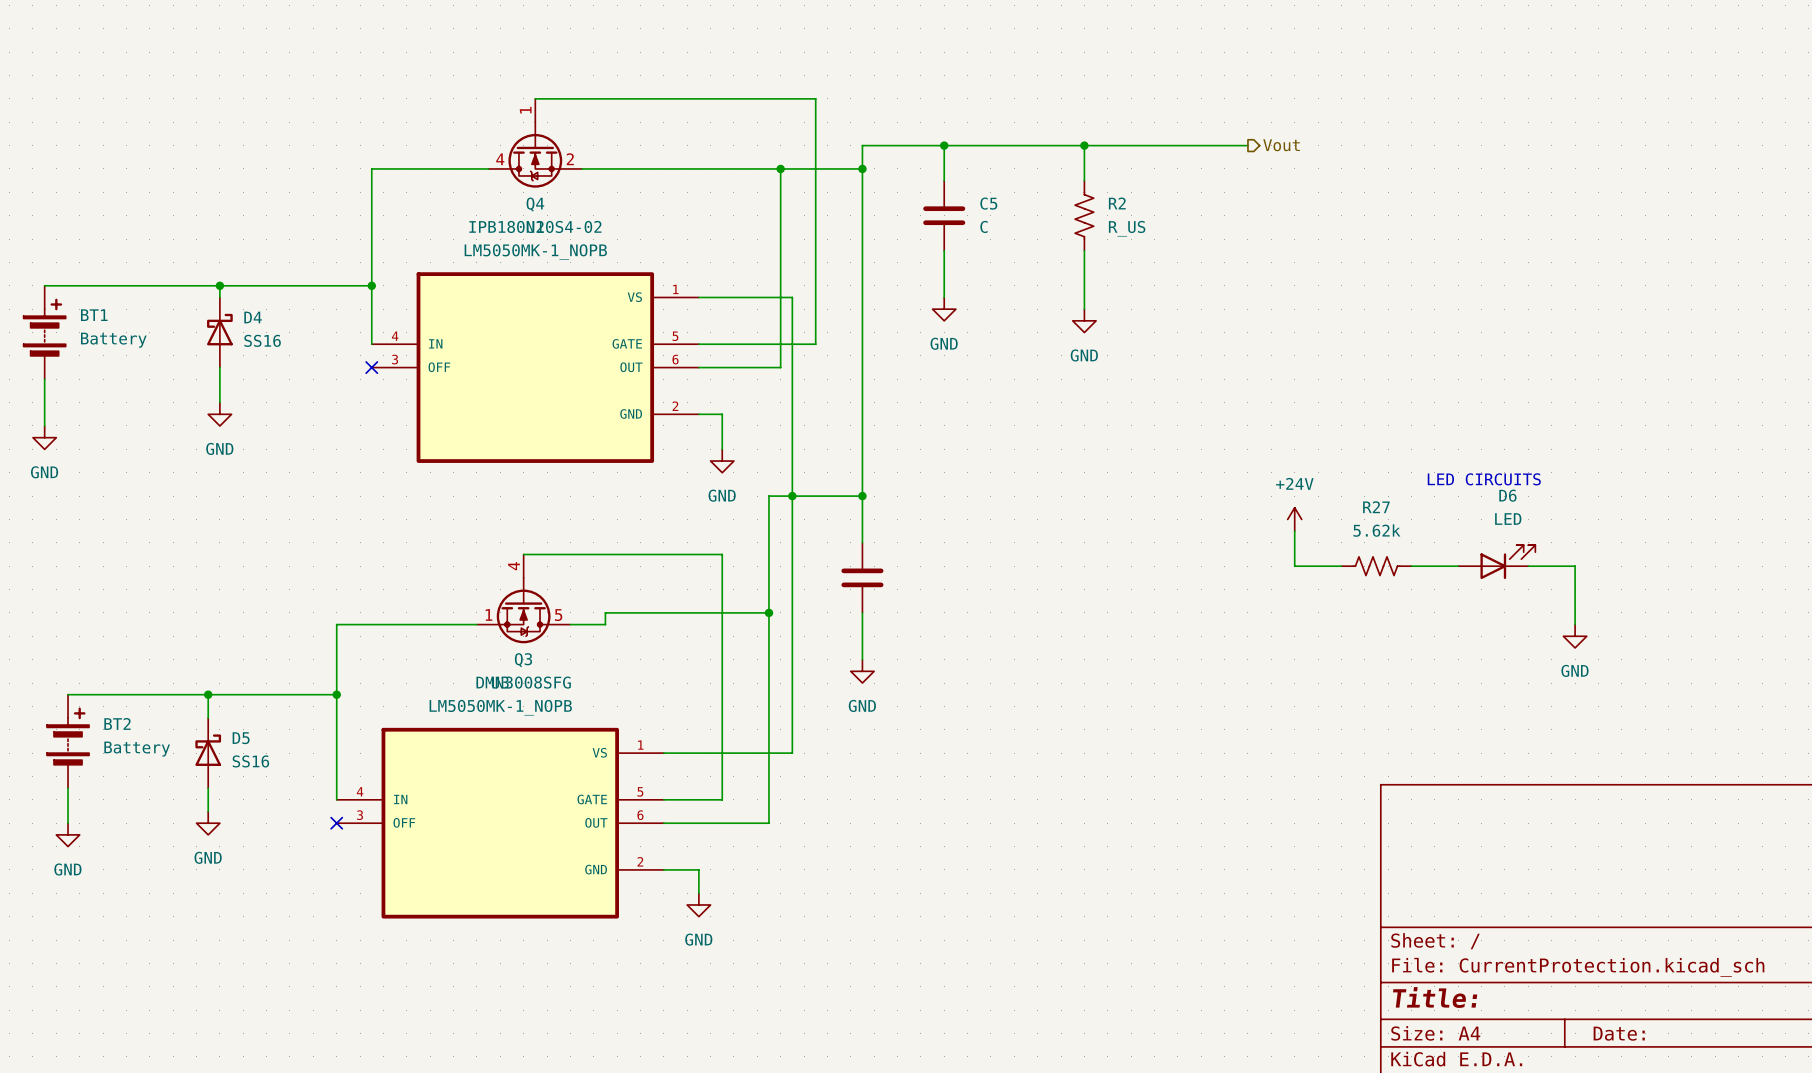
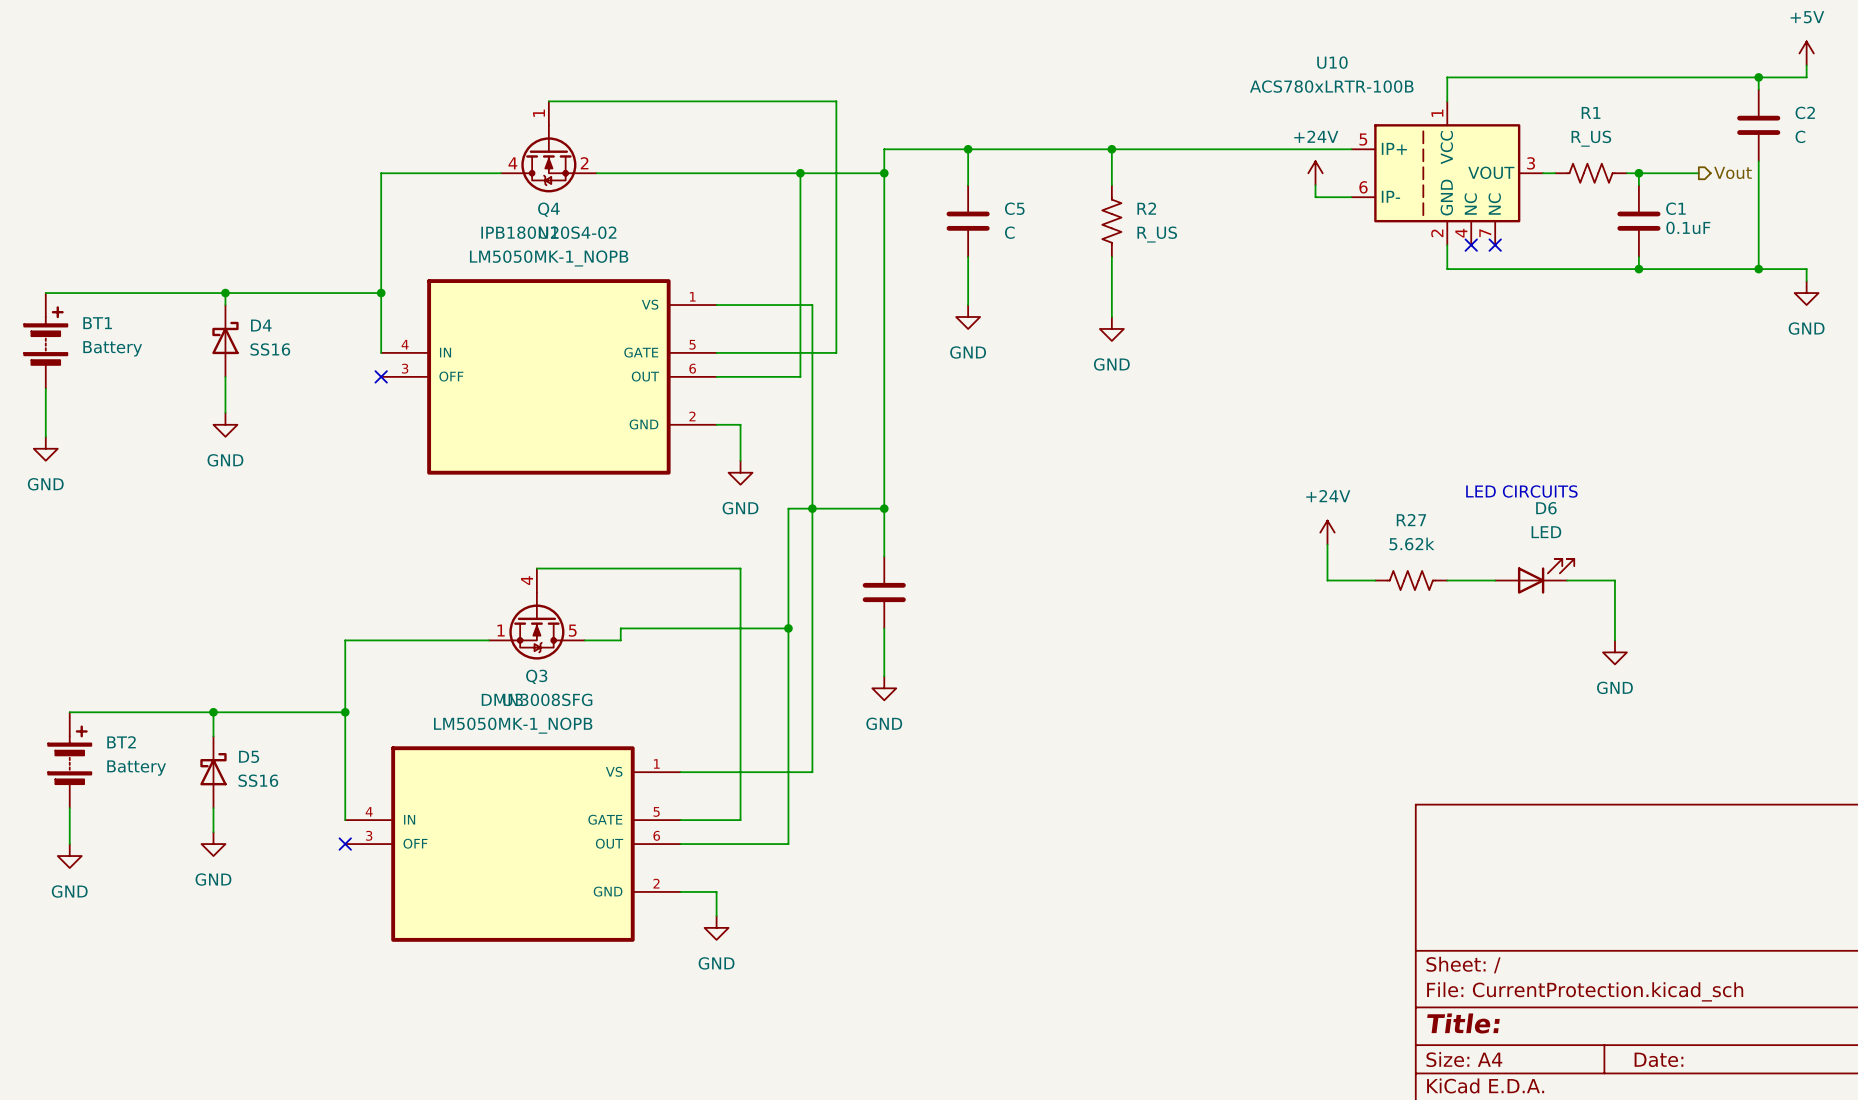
power symbol: none -> +5V (1806, 53)
wire: none -> (1806, 65) (1806, 77) (1447, 77) (1447, 101)
wire: none -> (1758, 77) (1758, 89)
junction: none -> (1758, 77)
C2: none -> C (1758, 125)
wire: none -> (1279, 149) (1351, 149)
hierarchical label: Vout (1281, 145) -> none
wire: none -> (1758, 161) (1758, 269)
power symbol: none -> +24V (1315, 173)
U10: none -> ACS780xLRTR-100B (1447, 173)
wire: none -> (1543, 173) (1555, 173)
R1: none -> R_US (1591, 173)
wire: none -> (1626, 173) (1698, 173)
wire: none -> (1638, 173) (1638, 185)
junction: none -> (1638, 173)
hierarchical label: none -> Vout (1732, 172)
wire: none -> (1315, 185) (1315, 197) (1351, 197)
C1: none -> 0.1uF (1638, 221)
wire: none -> (1447, 245) (1447, 269) (1806, 269) (1806, 281)
no-connect mark: none -> (1471, 245)
no-connect mark: none -> (1495, 245)
wire: none -> (1638, 257) (1638, 269)
junction: none -> (1638, 269)
junction: none -> (1758, 269)
power symbol: none -> GND (1806, 293)

